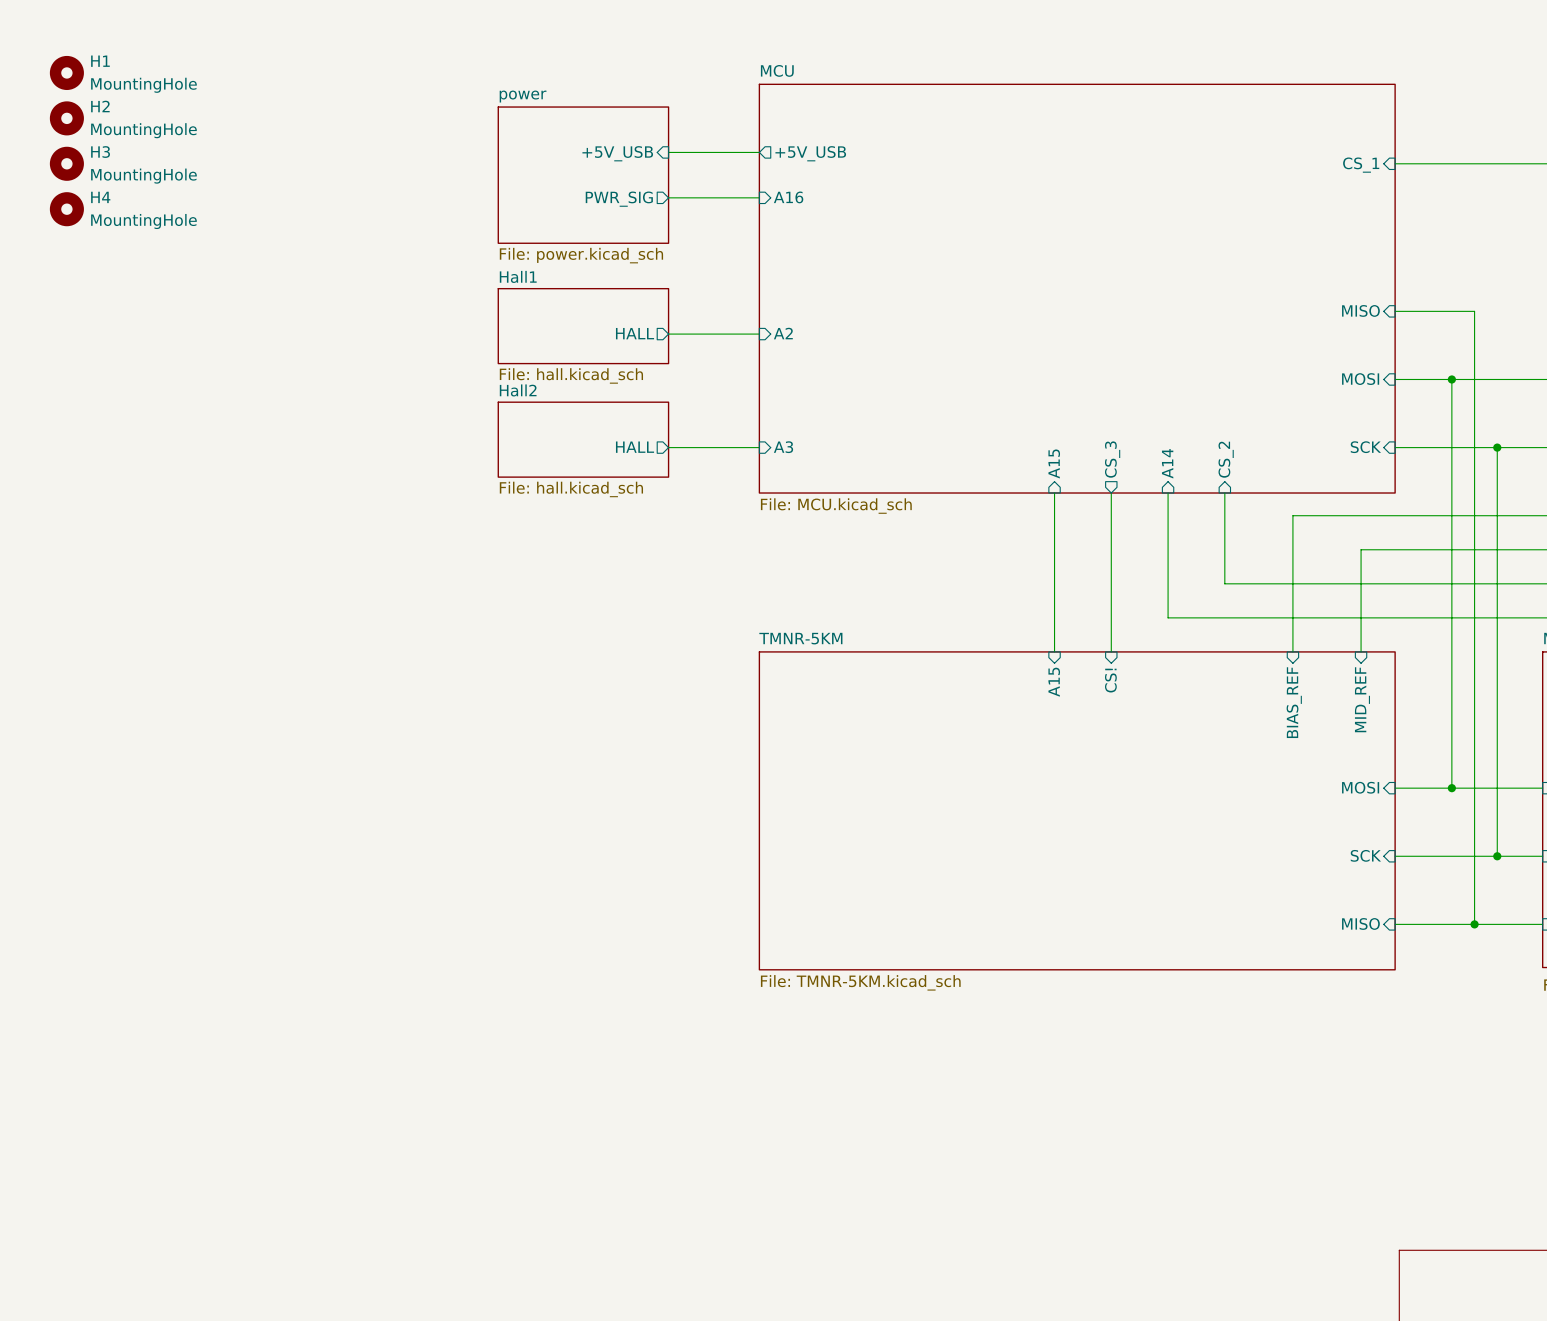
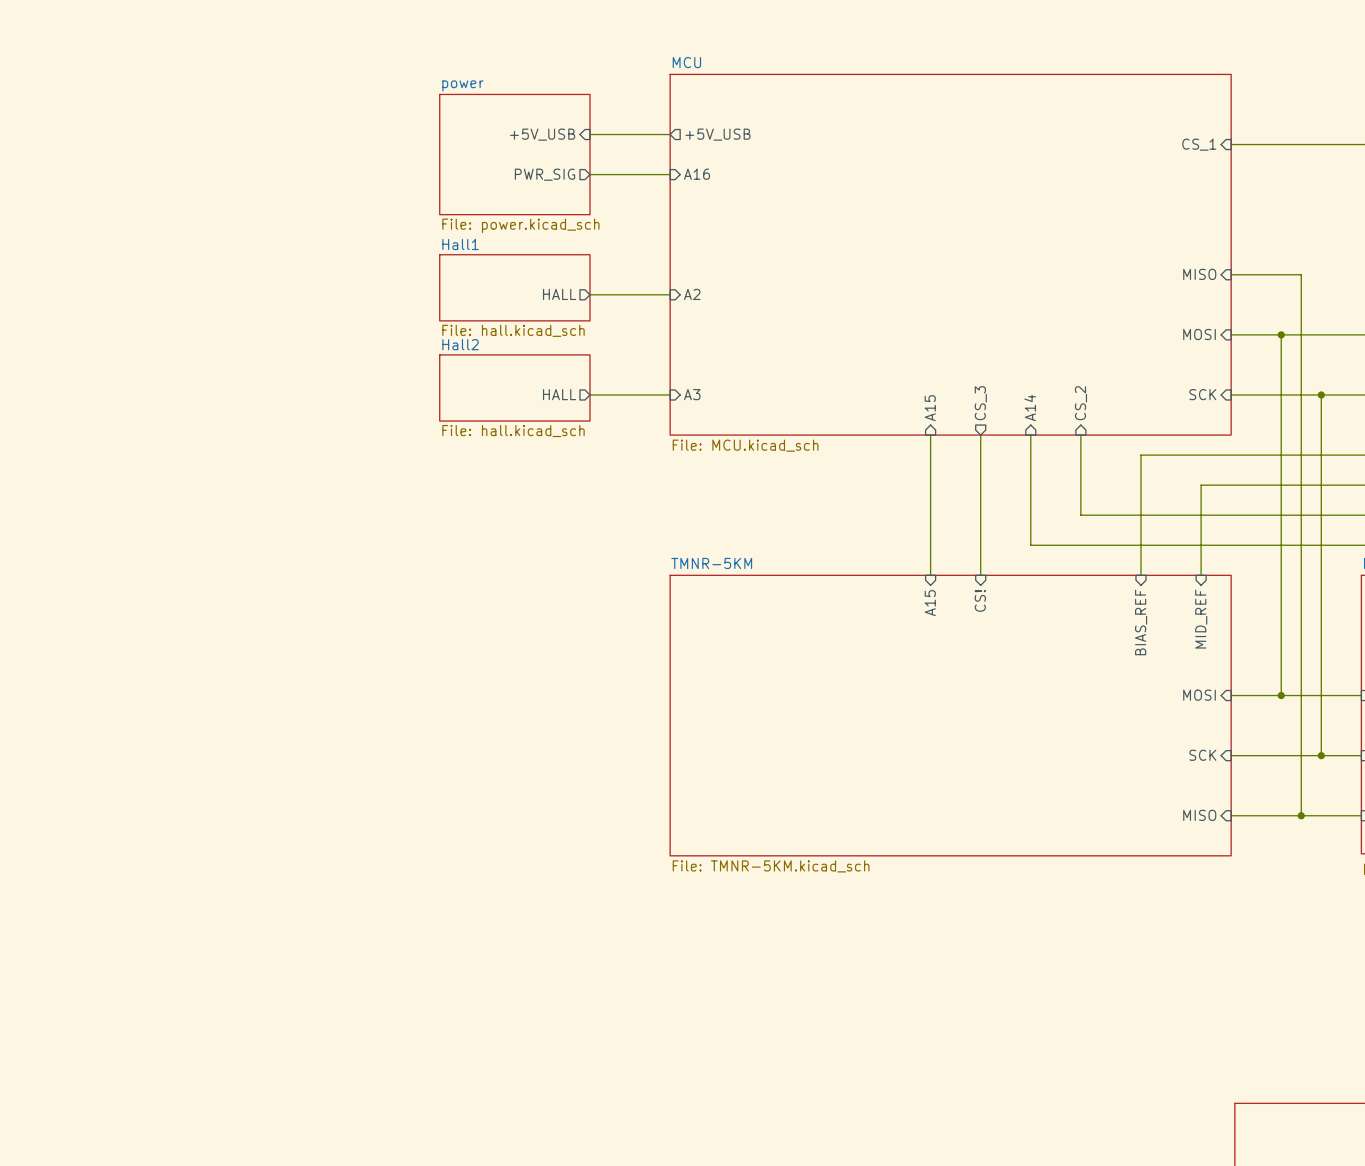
H1: MountingHole (66, 72) -> none
H2: MountingHole (66, 118) -> none
H3: MountingHole (66, 163) -> none
H4: MountingHole (66, 209) -> none

